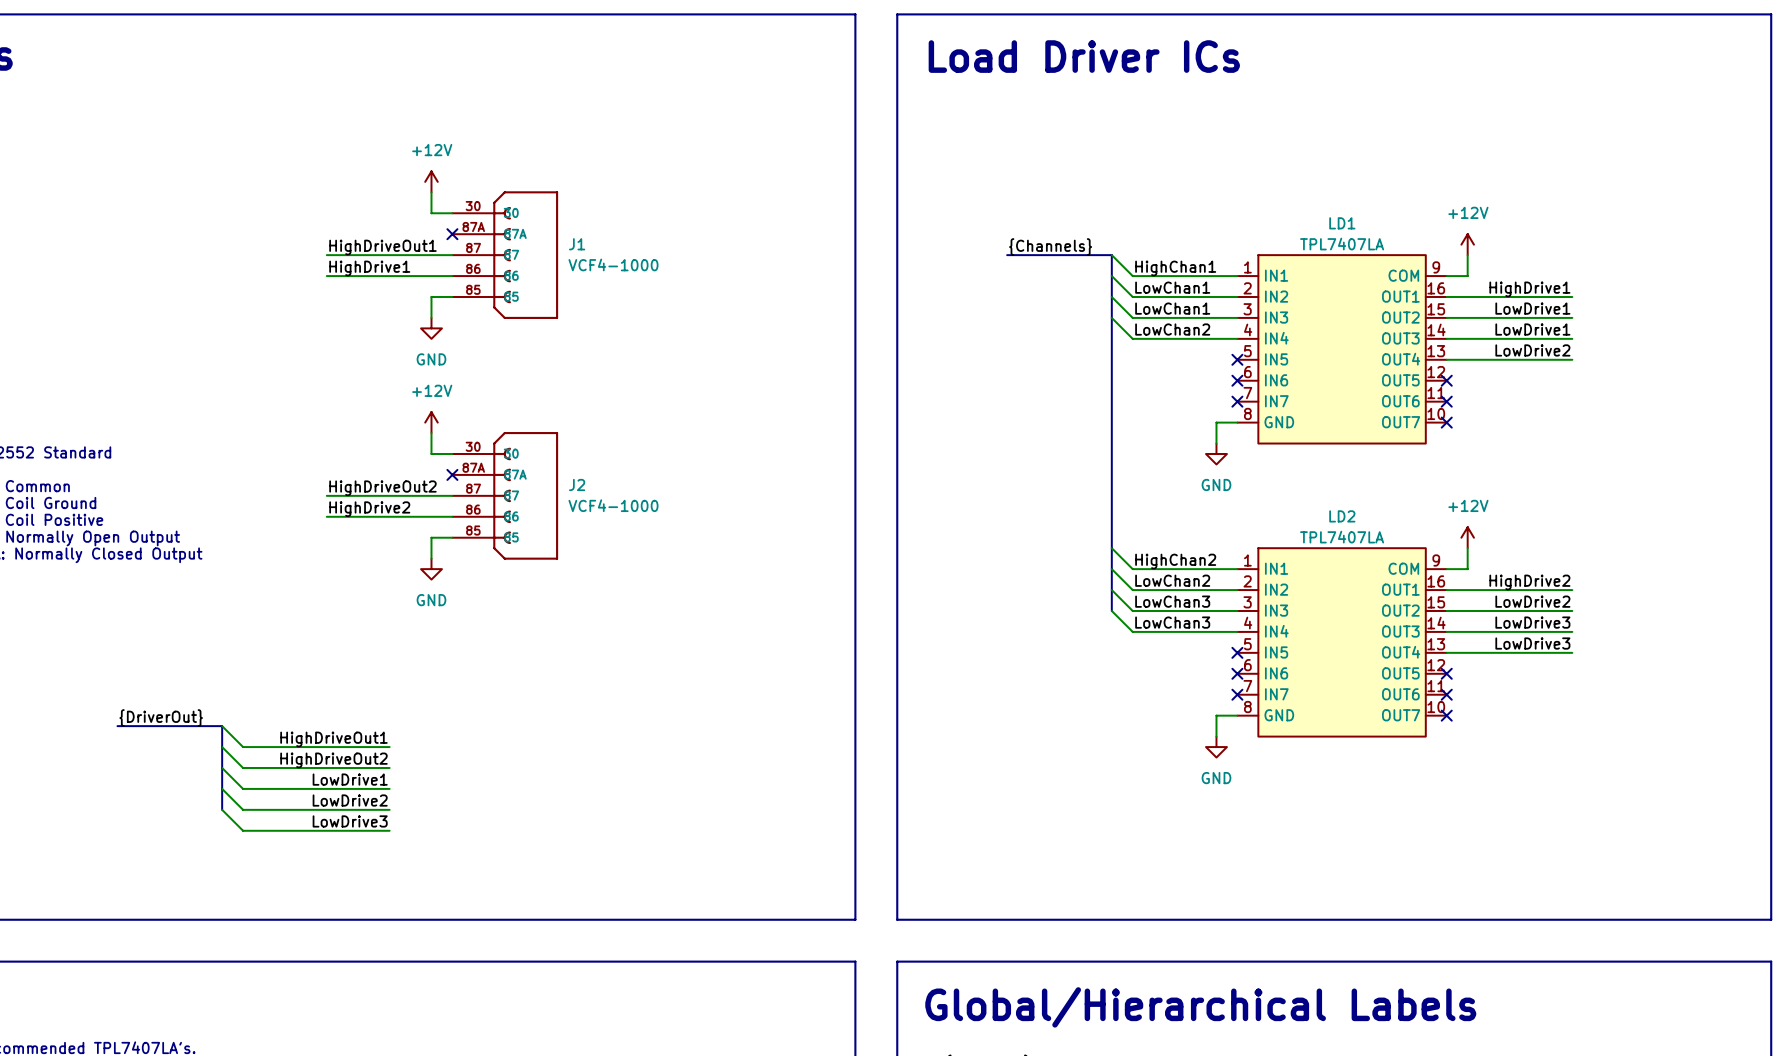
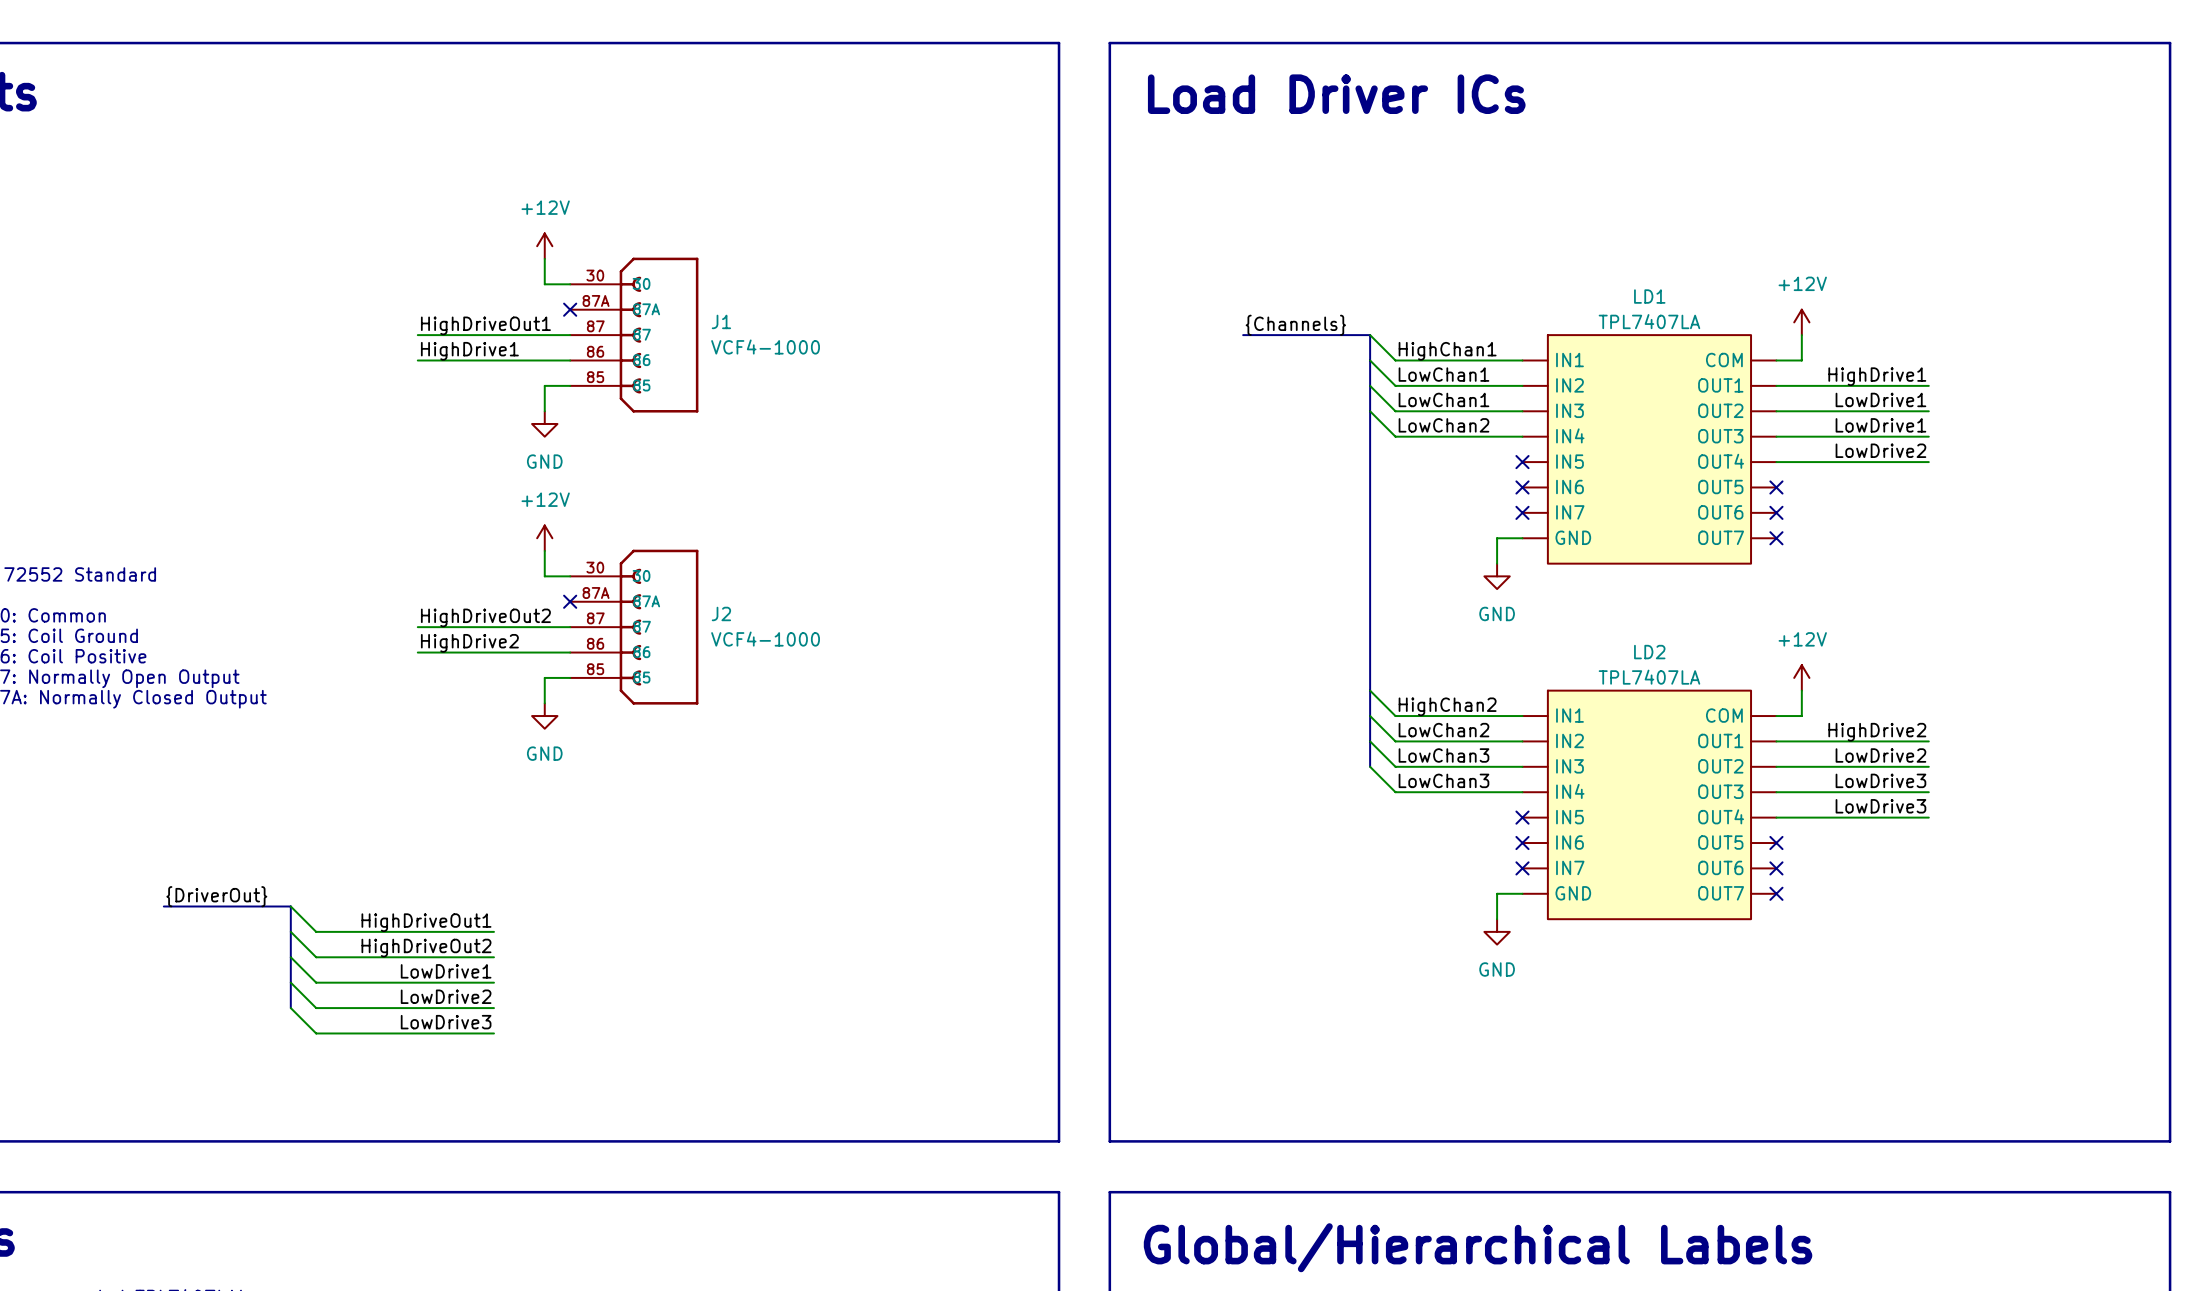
LD1 symbol: [1237, 255, 1447, 444] -> [1522, 335, 1777, 564]
LD2 symbol: [1237, 548, 1447, 737] -> [1522, 690, 1777, 920]

